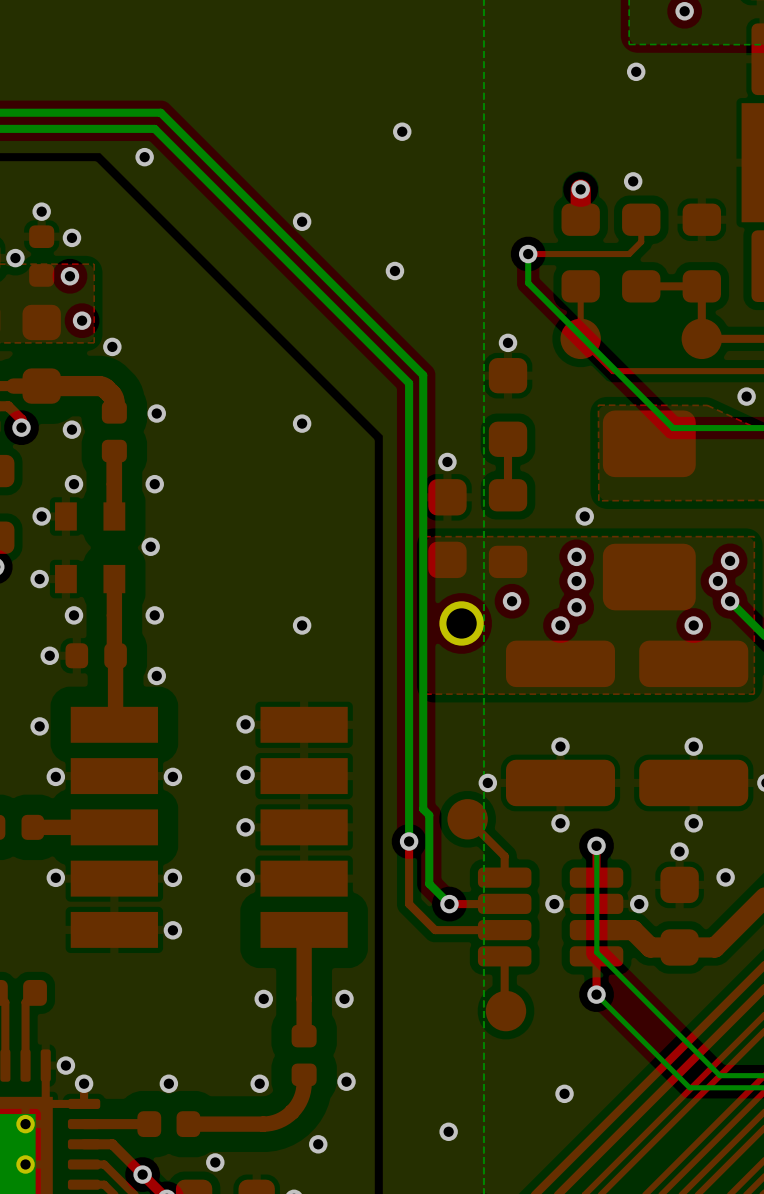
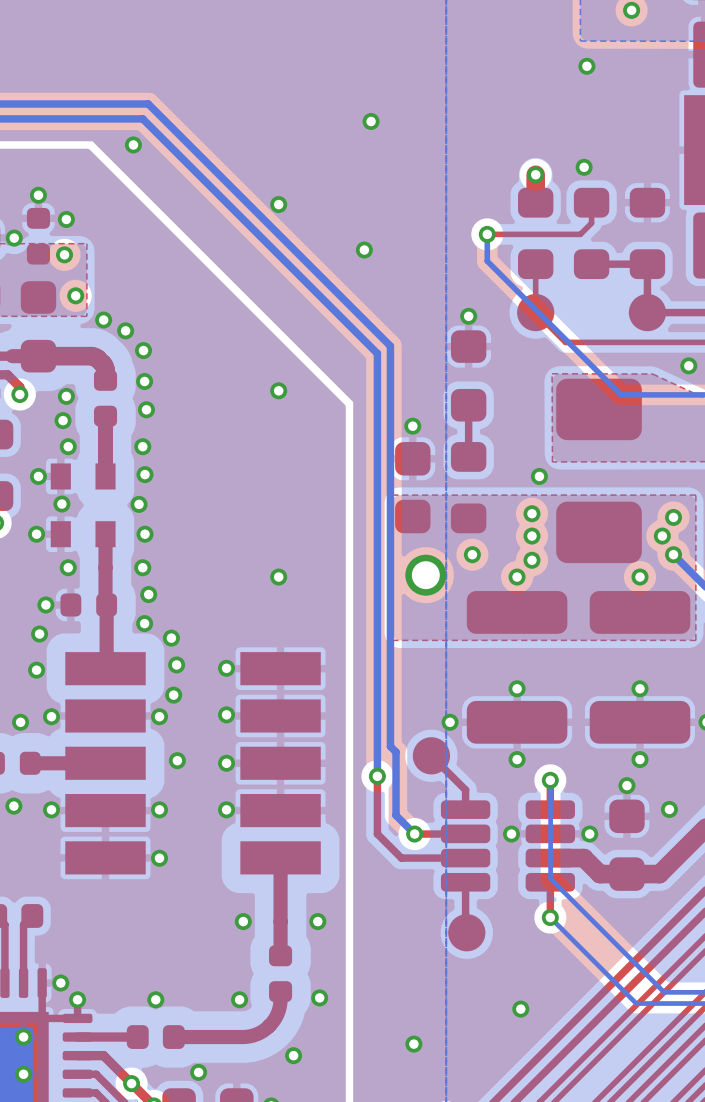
via: none -> (125, 330)
via: none -> (143, 350)
via: none -> (146, 409)
via: none -> (63, 420)
via: none -> (144, 474)
via: none -> (61, 504)
via: none -> (144, 534)
via: none -> (148, 594)
via: none -> (39, 634)
via: none -> (171, 638)
via: none -> (176, 664)
via: none -> (173, 695)
via: none -> (20, 722)
via: none -> (177, 760)
via: none -> (13, 806)

